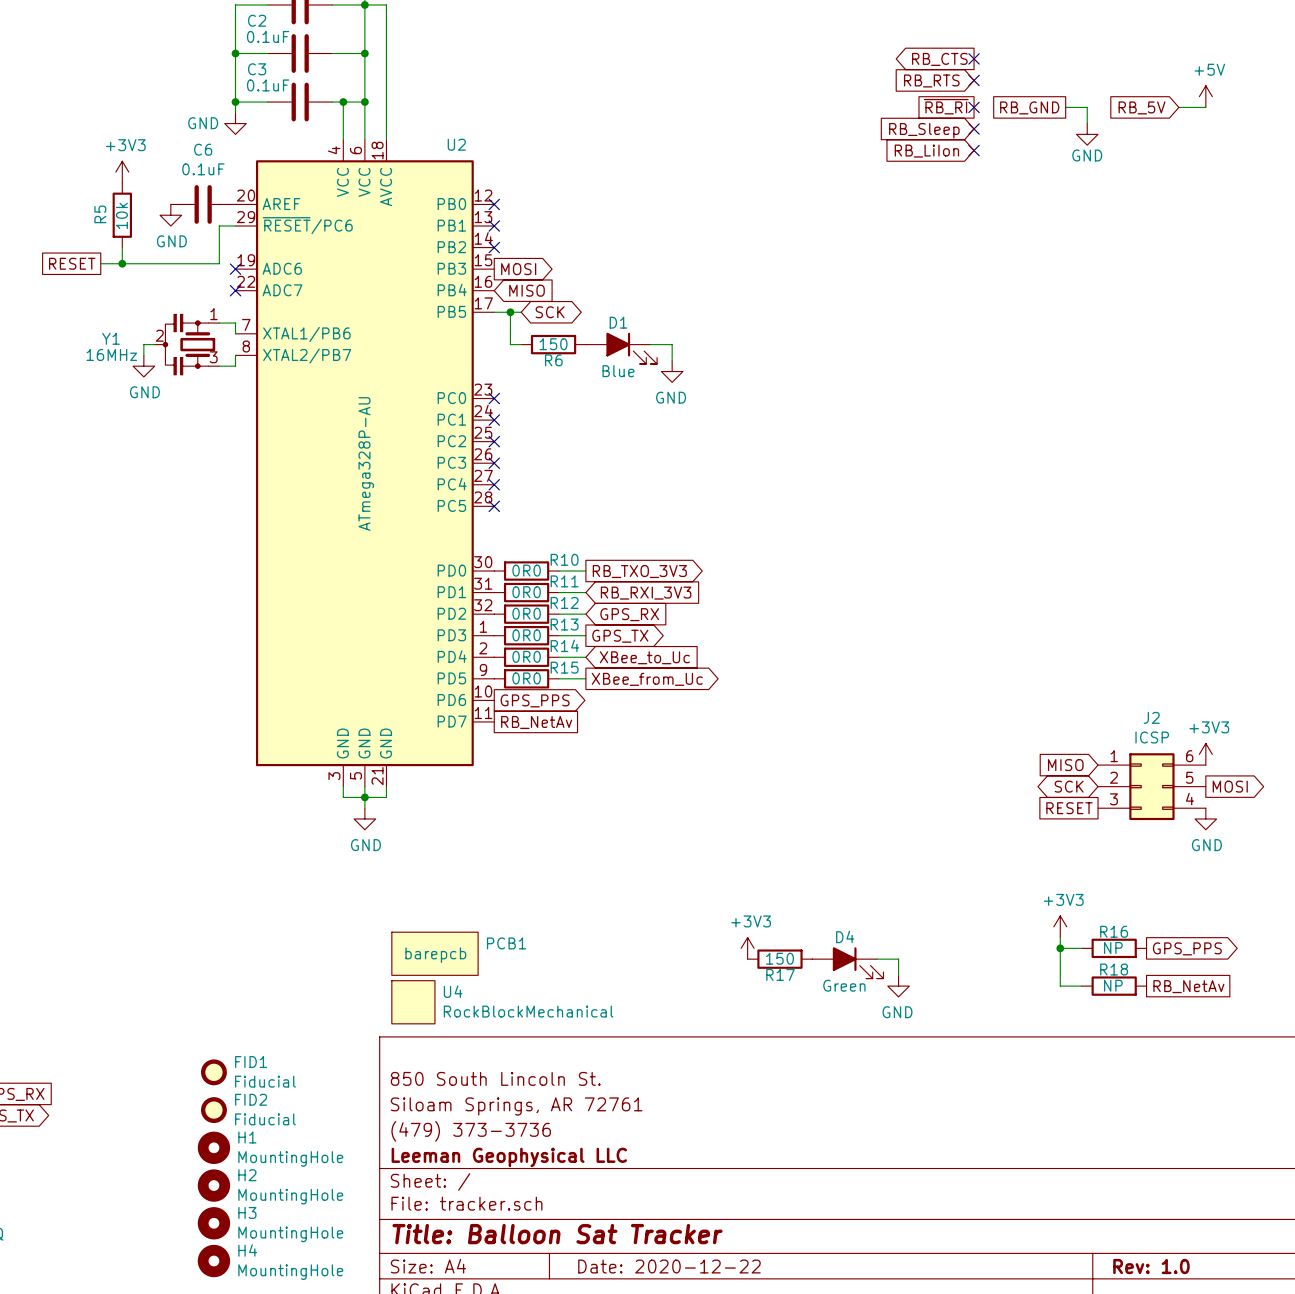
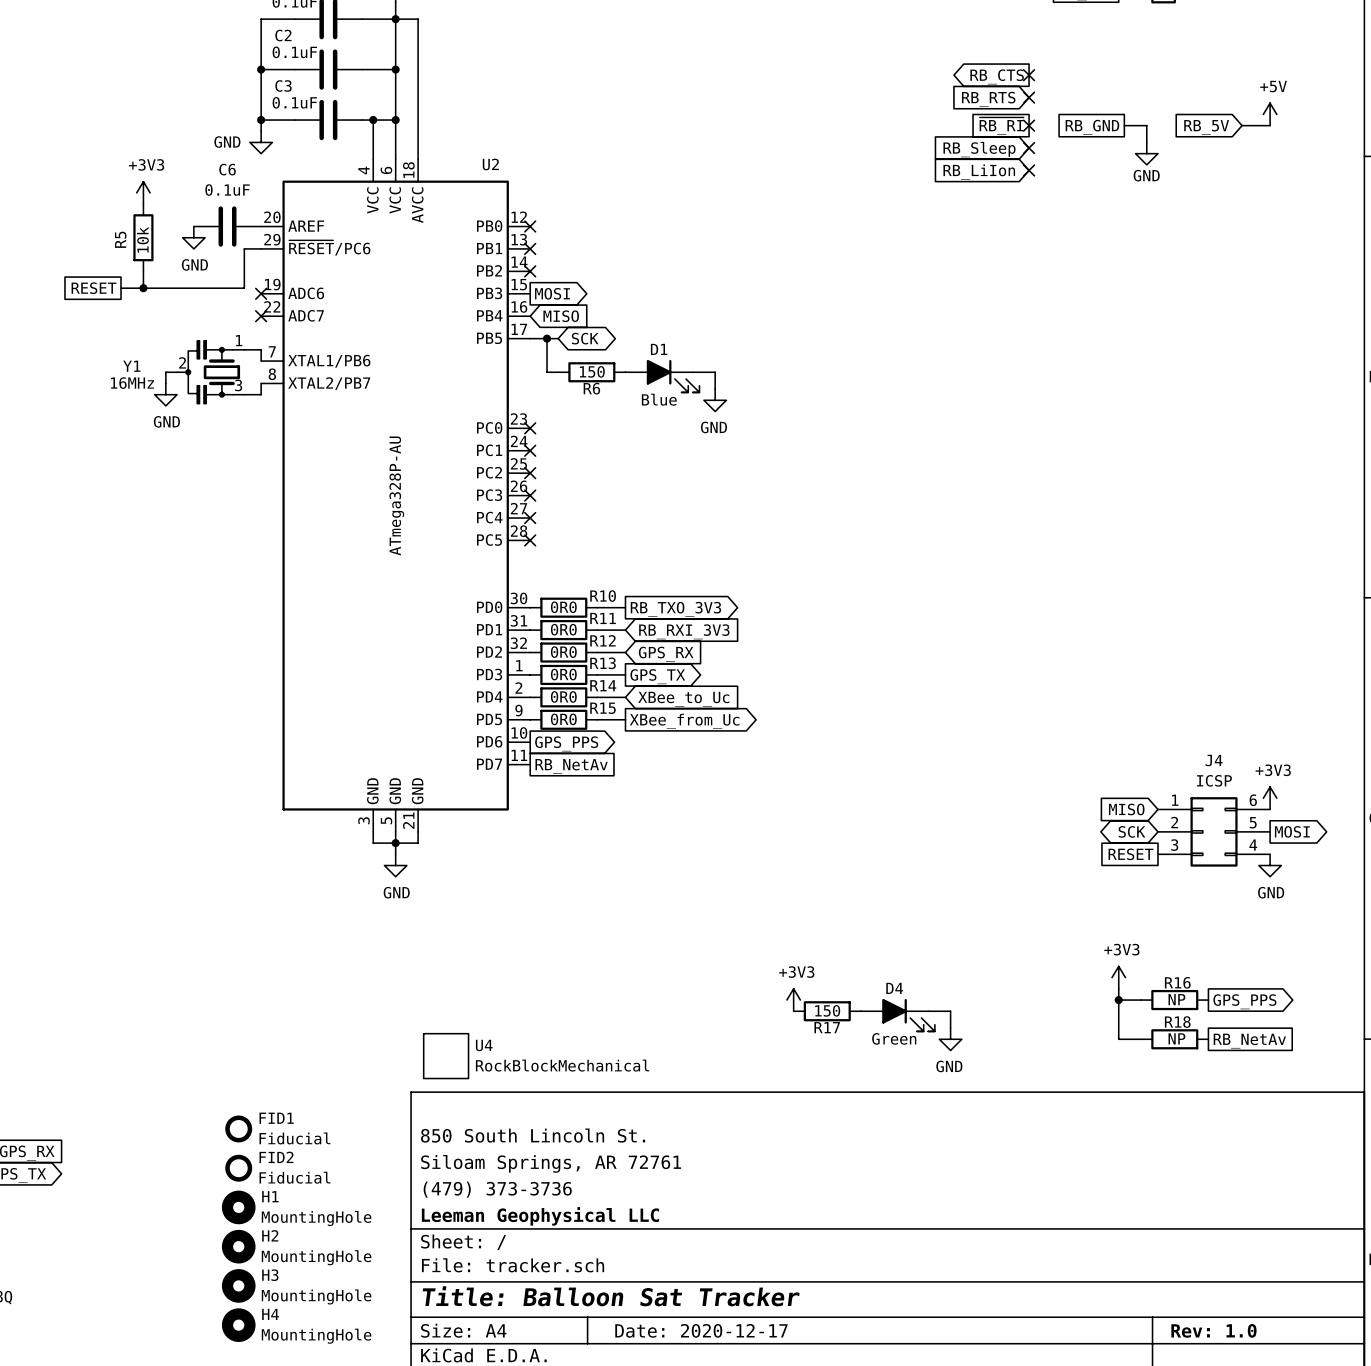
J2 name: J2 (1151, 717) -> J4 (1214, 760)
PCB1: barepcb (434, 953) -> none
title block: Date: 2020-12-22 (669, 1266) -> Date: 2020-12-17 (701, 1330)

